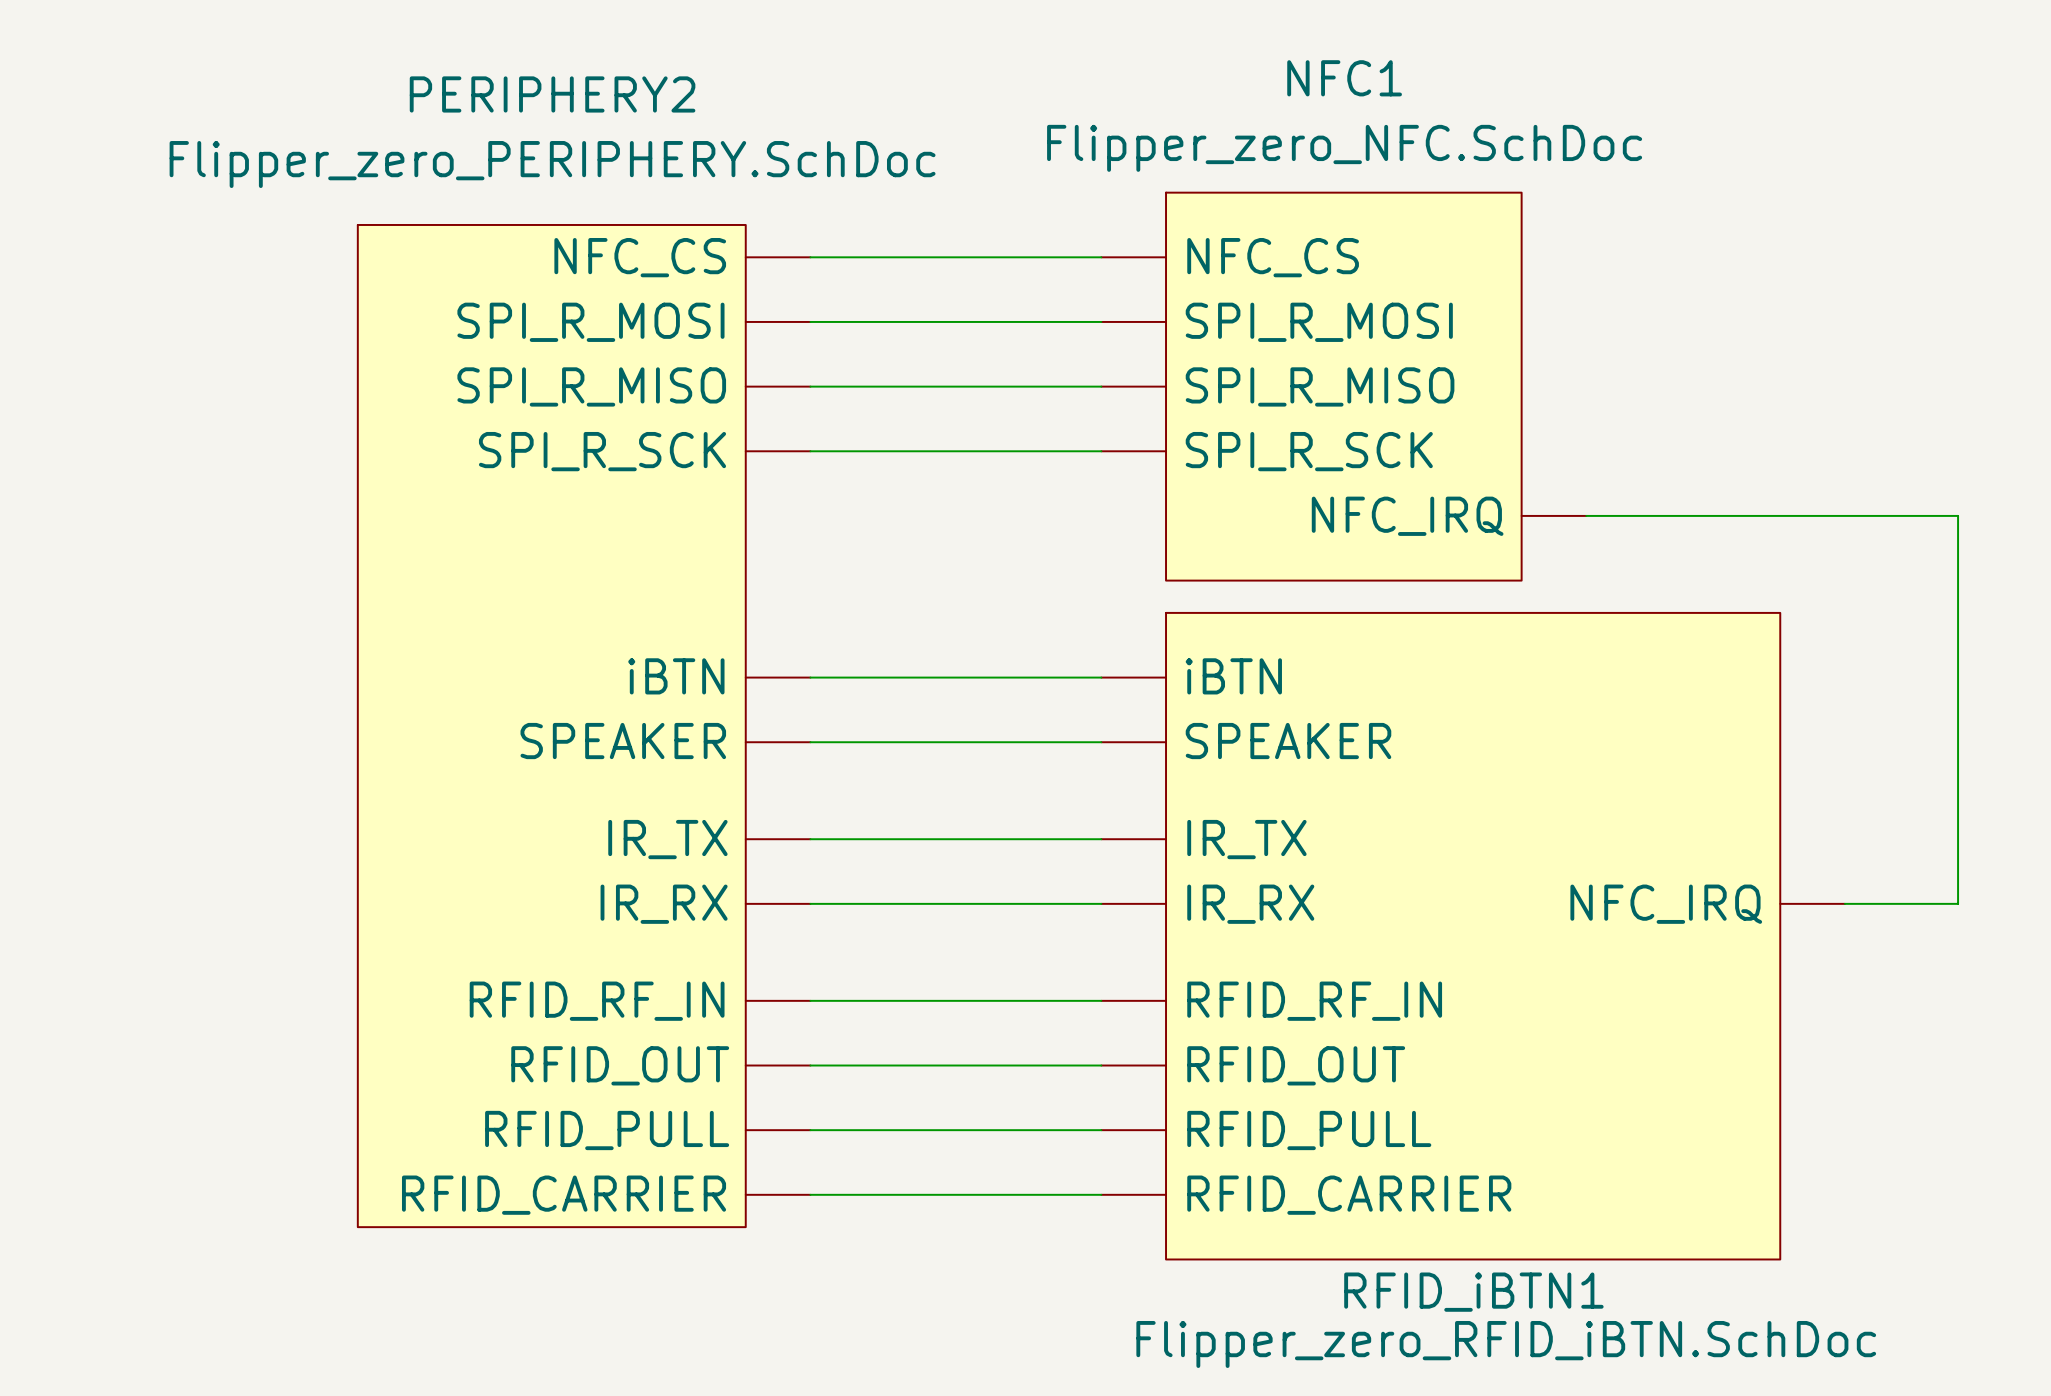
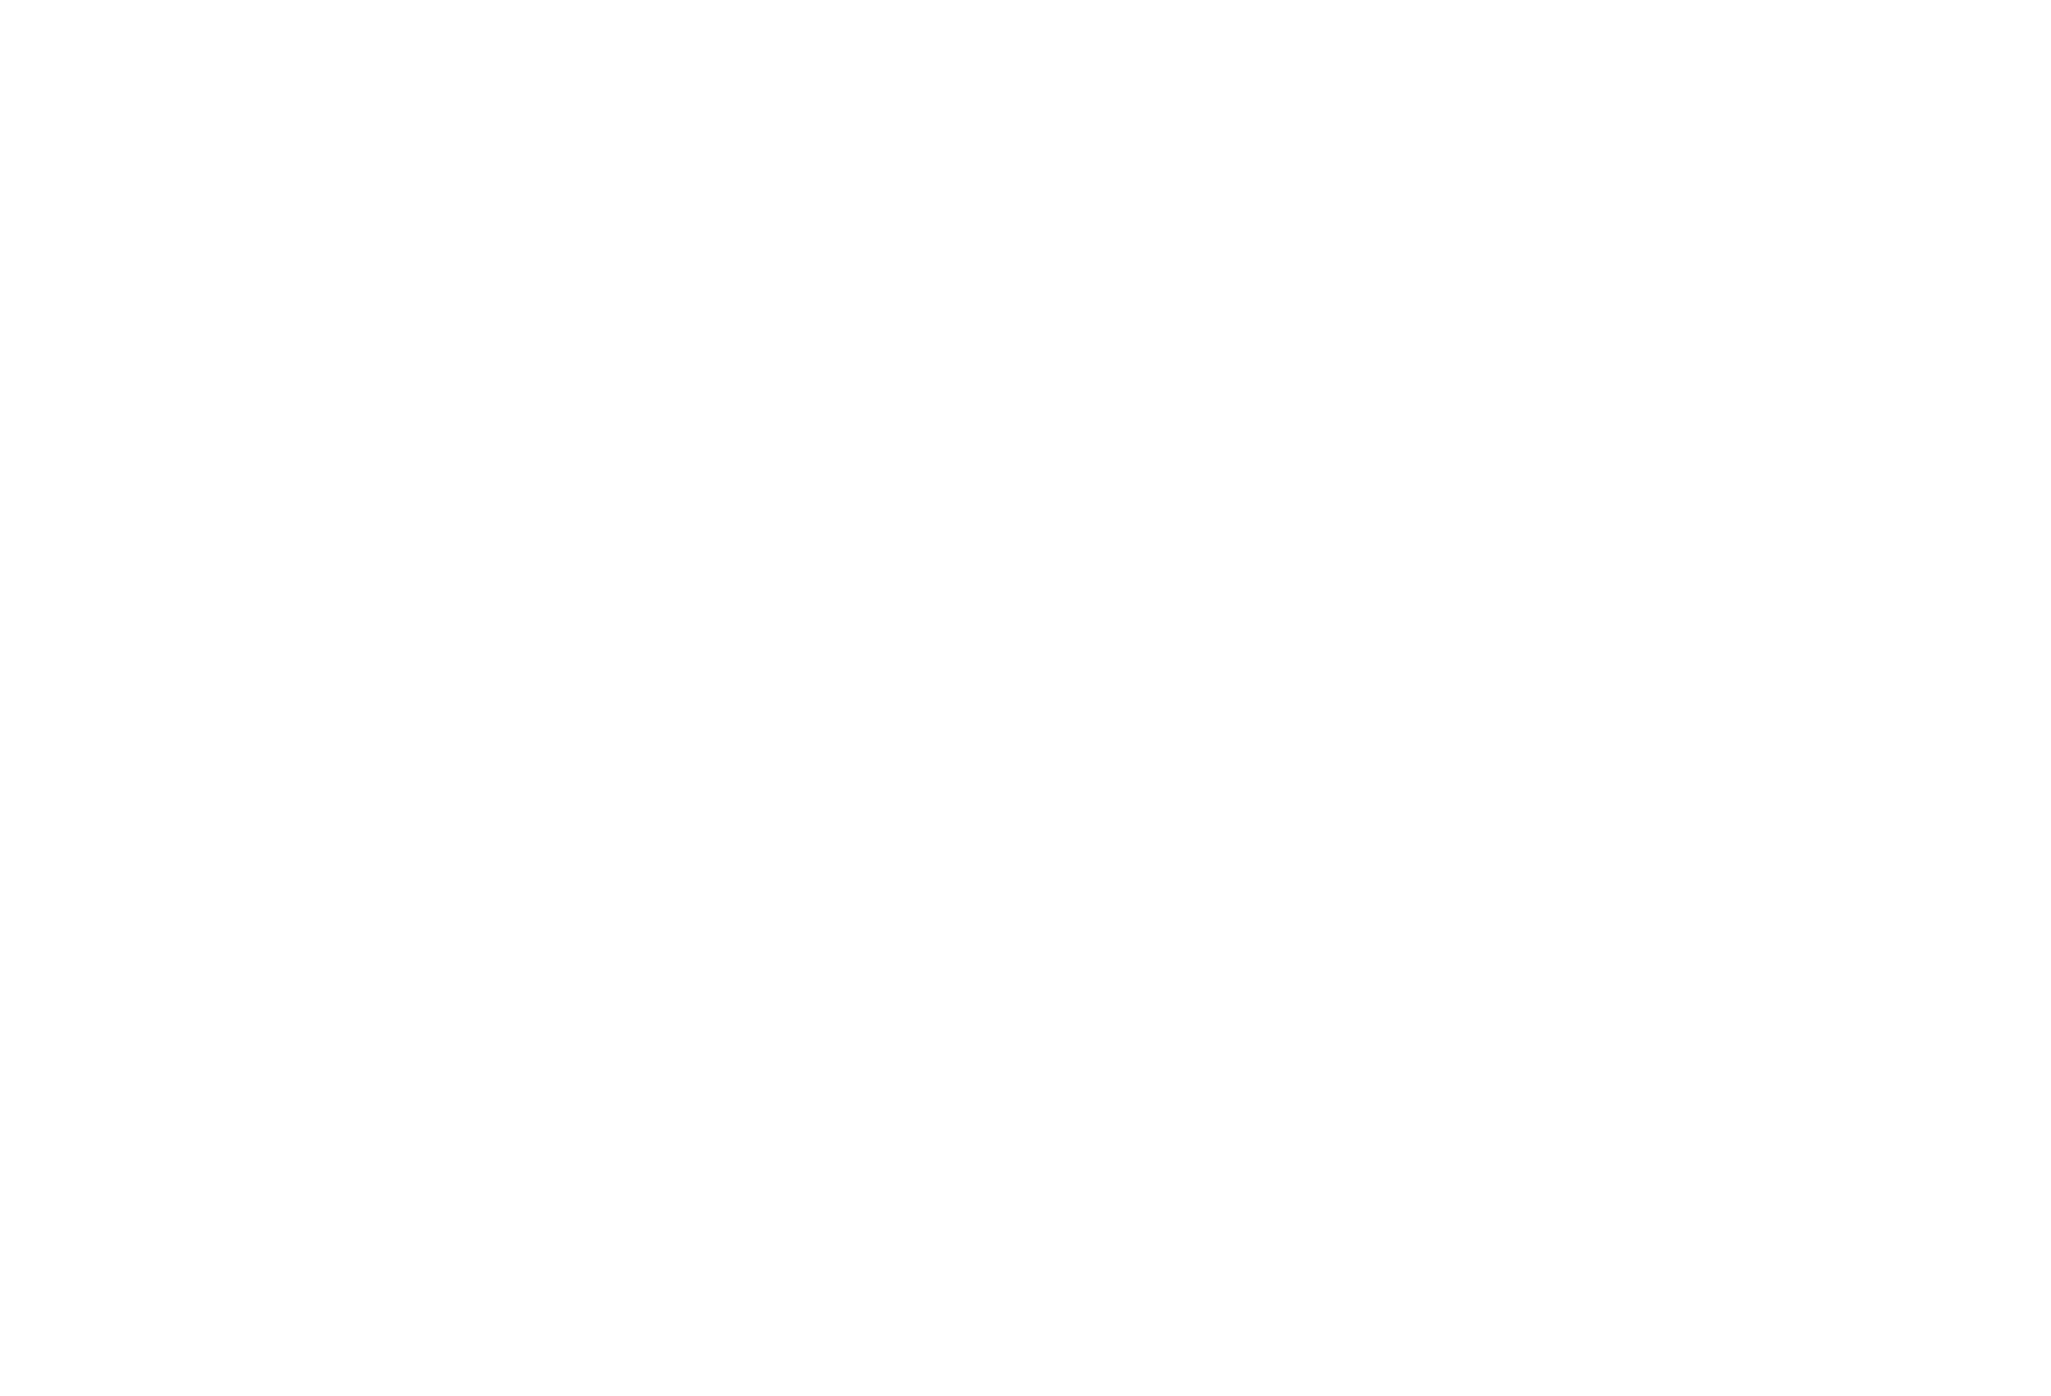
wire: (810, 257) (1101, 257) -> none
wire: (810, 321) (1101, 321) -> none
wire: (810, 386) (1101, 386) -> none
NFC1: Flipper_zero_NFC.SchDoc (1343, 386) -> none
wire: (810, 451) (1101, 451) -> none
wire: (1586, 515) (1958, 515) (1958, 903) (1844, 903) -> none
wire: (810, 677) (1101, 677) -> none
PERIPHERY2: Flipper_zero_PERIPHERY.SchDoc (584, 726) -> none
wire: (810, 742) (1101, 742) -> none
wire: (810, 839) (1101, 839) -> none
wire: (810, 903) (1101, 903) -> none
RFID_iBTN1: Flipper_zero_RFID_iBTN.SchDoc (1473, 936) -> none
wire: (810, 1000) (1101, 1000) -> none
wire: (810, 1065) (1101, 1065) -> none
wire: (810, 1130) (1101, 1130) -> none
wire: (810, 1194) (1101, 1194) -> none

